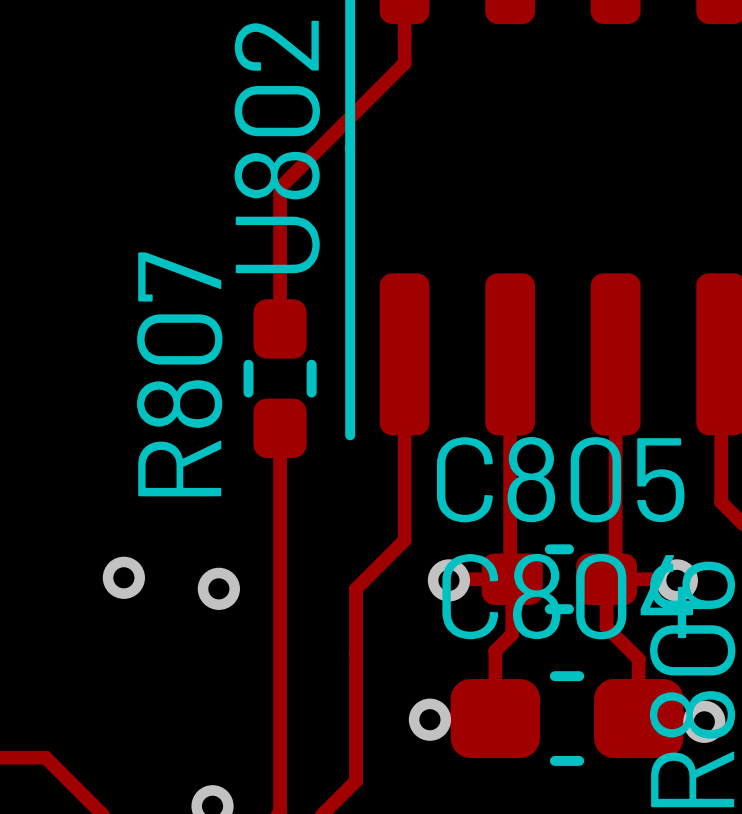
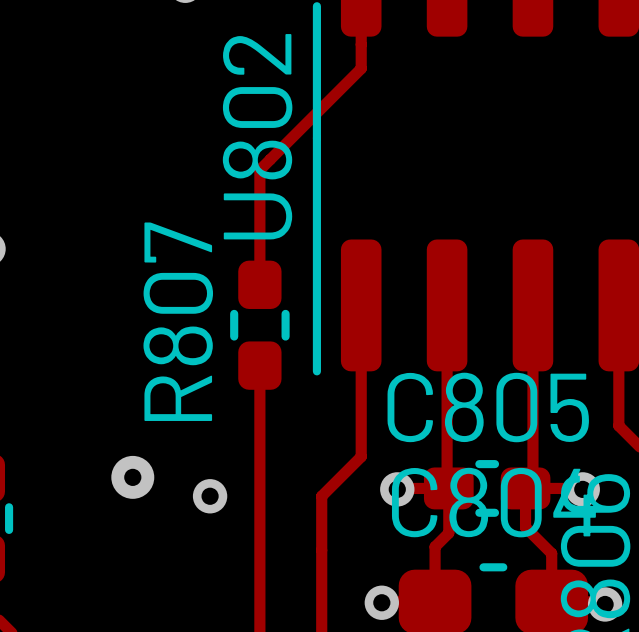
via size: [102, 556, 145, 599] -> [111, 455, 155, 499]

